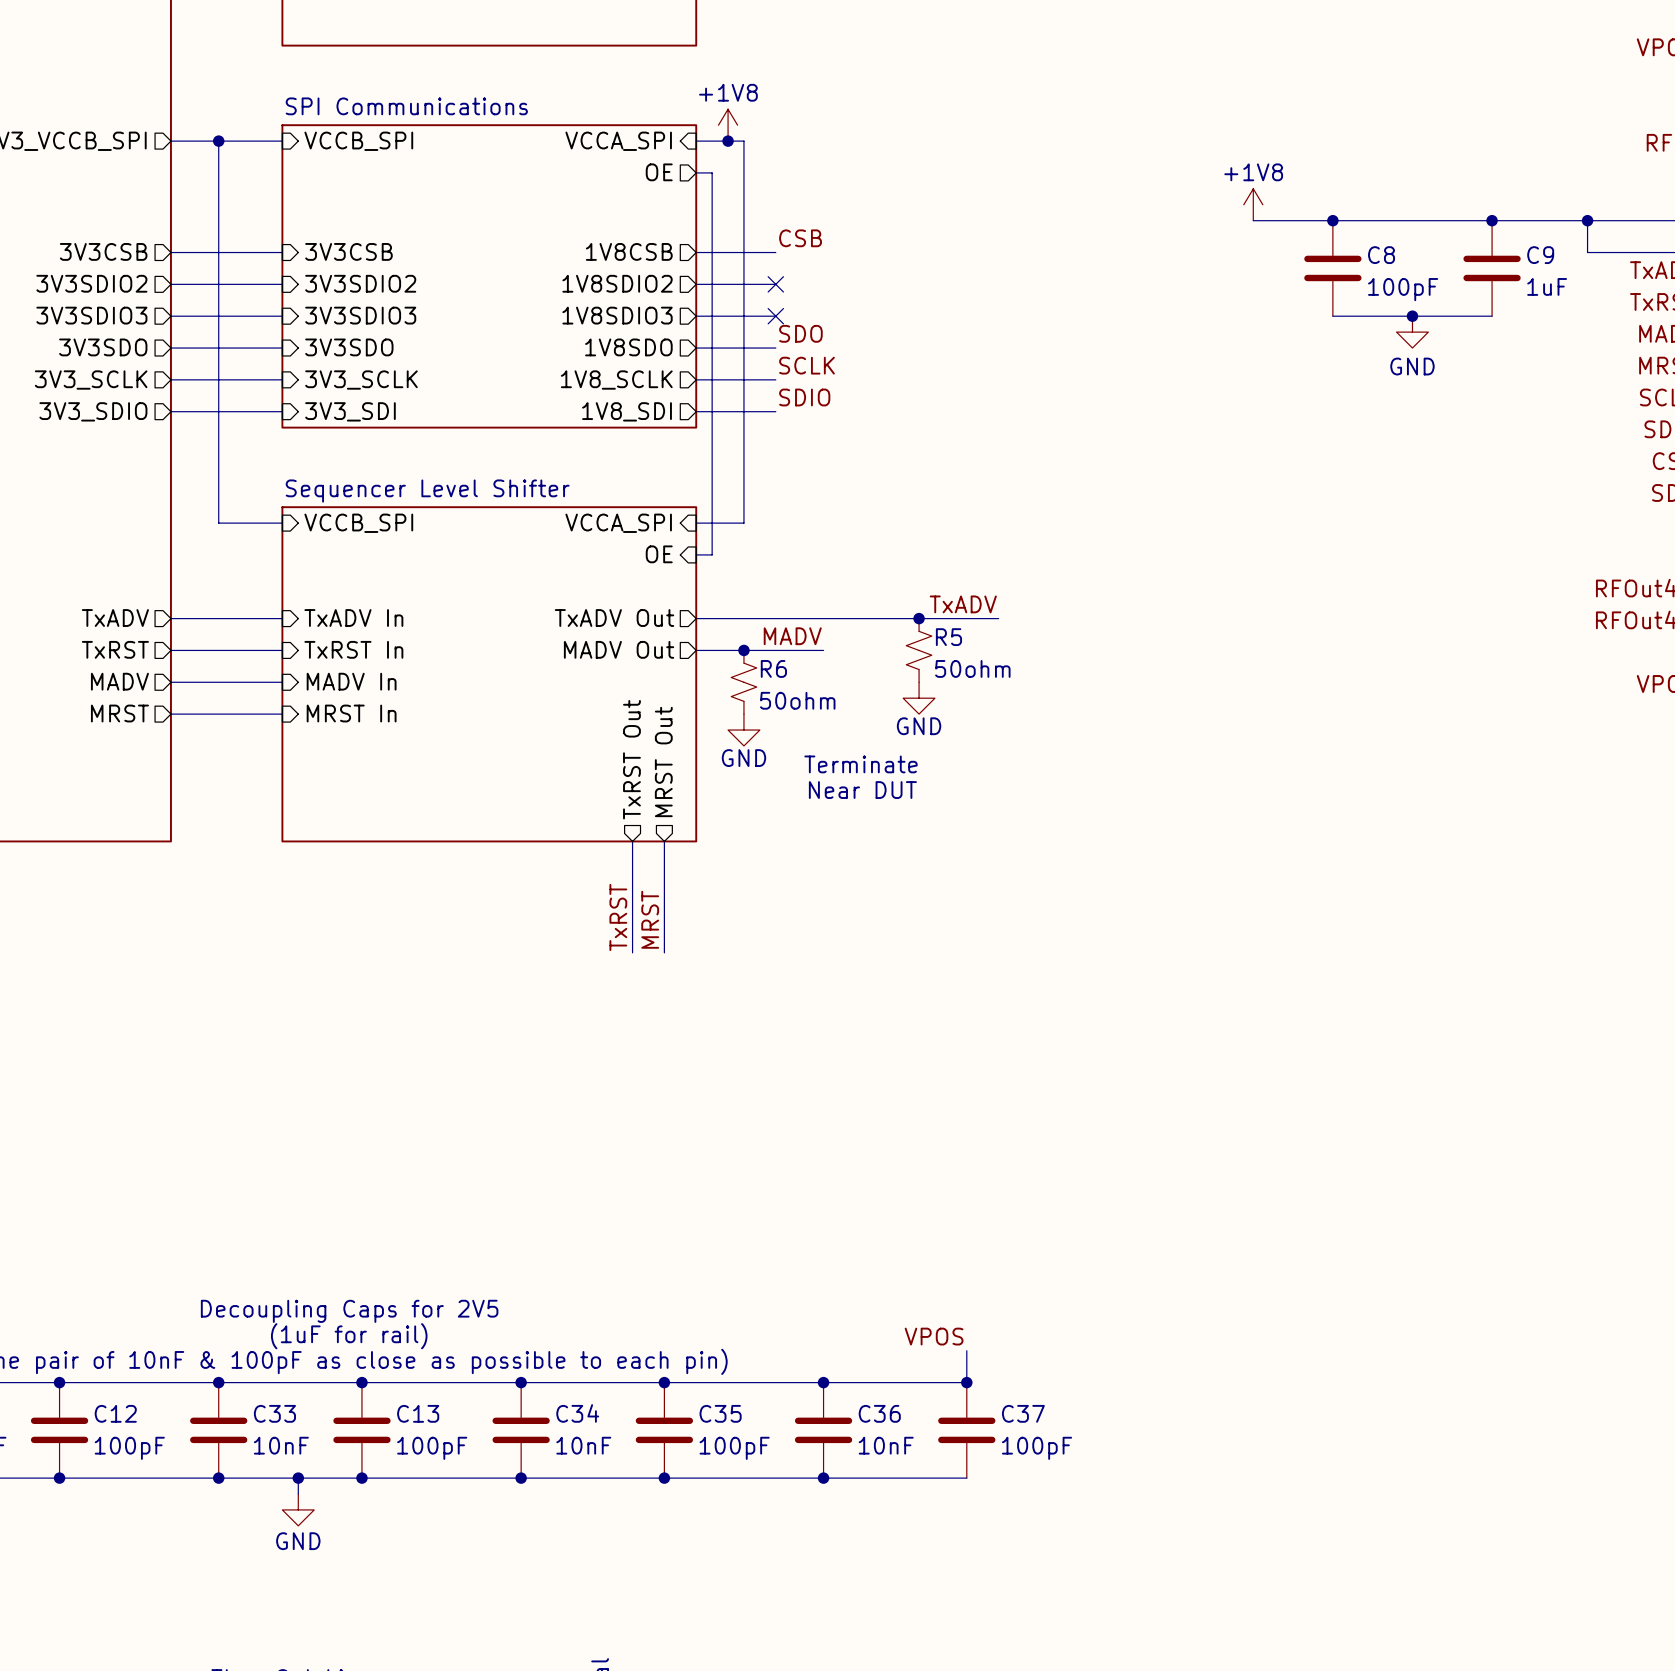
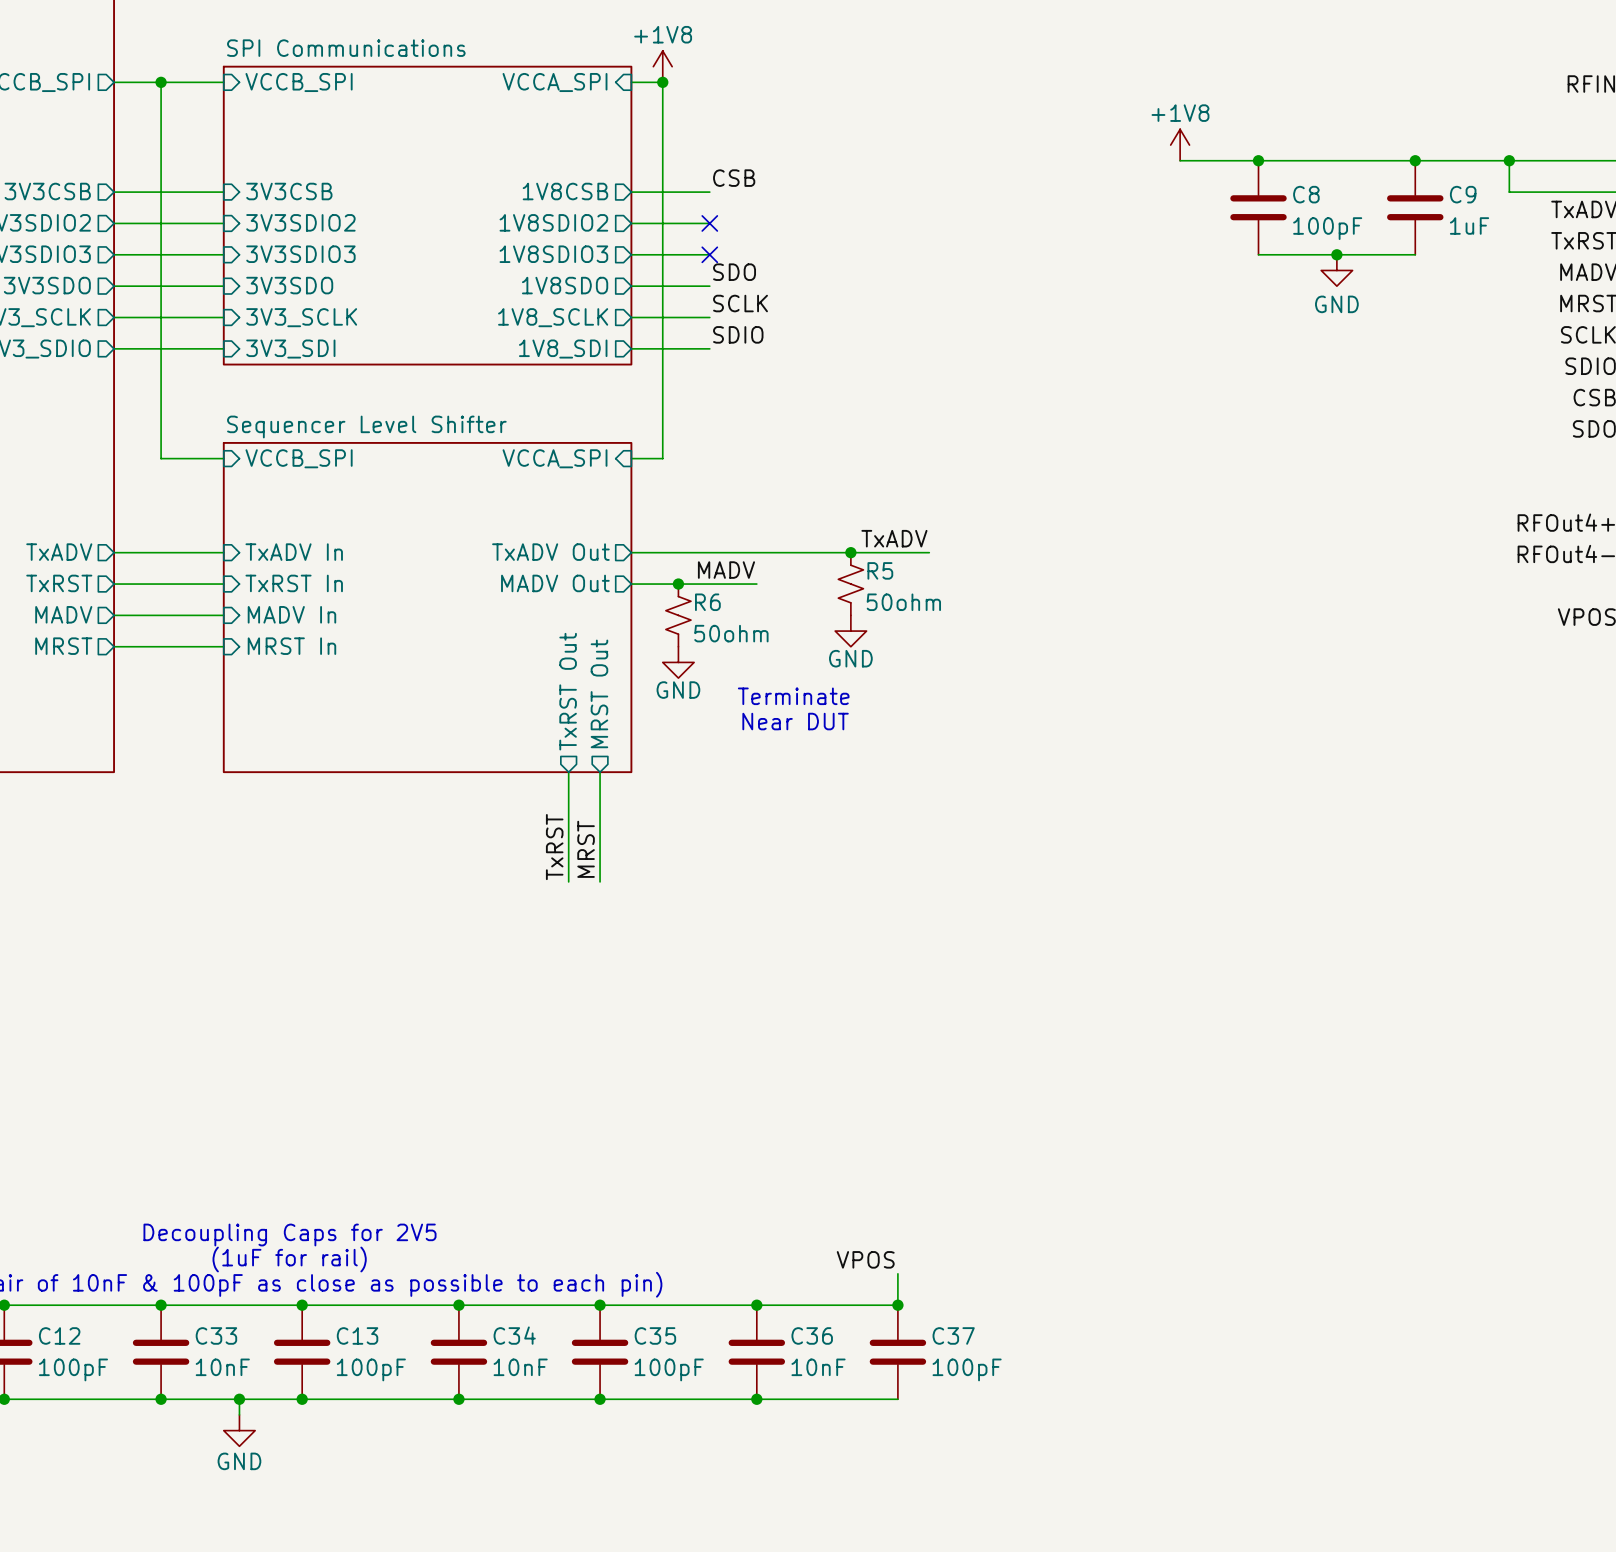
wire: (728, 141) (743, 141) (743, 523) (728, 523) -> (662, 82) (662, 458)
sheet pin: OE (659, 172) -> none
wire: (696, 172) (712, 172) (712, 554) (696, 554) -> none
sheet pin: OE (659, 554) -> none

